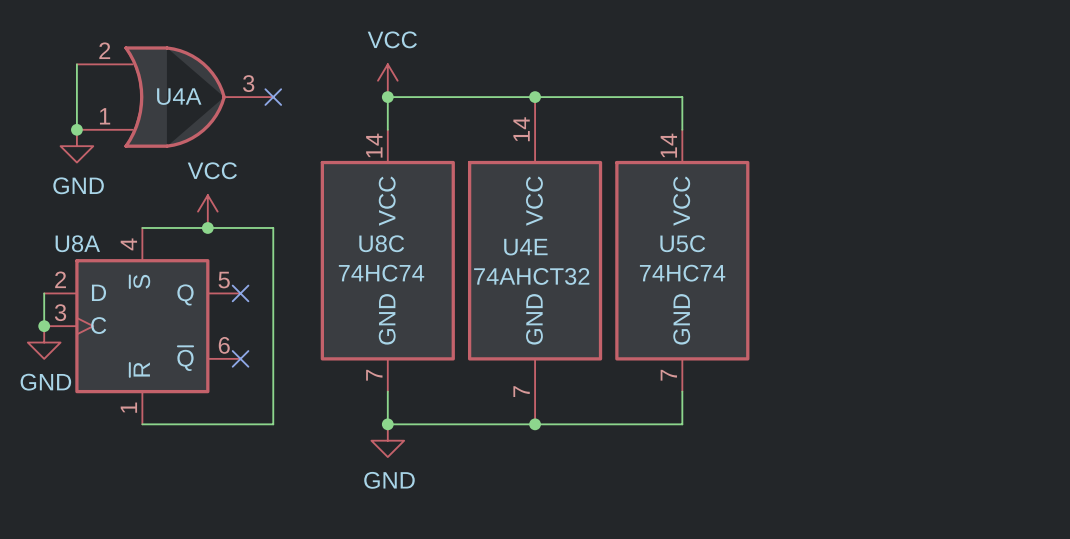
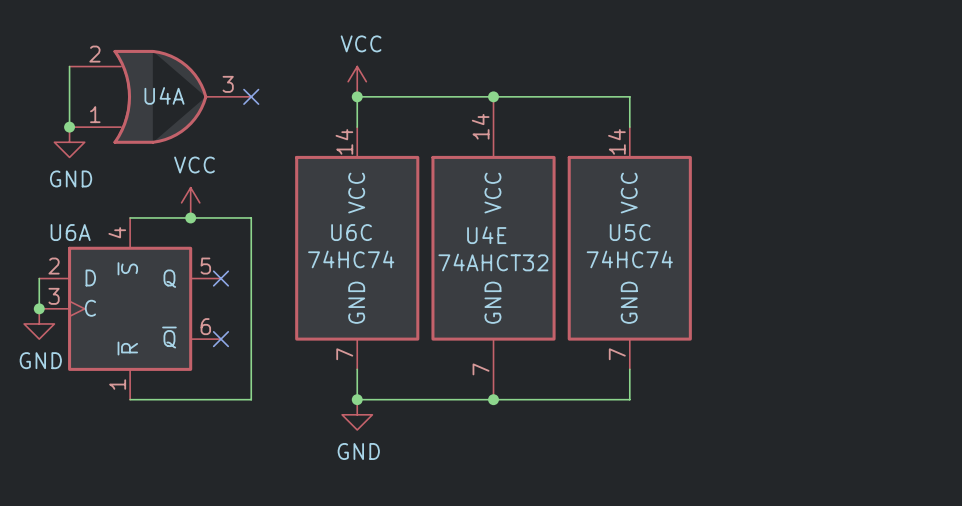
U8A name: U8A (77, 243) -> U6A (70, 232)
U8C name: U8C (381, 243) -> U6C (351, 232)

